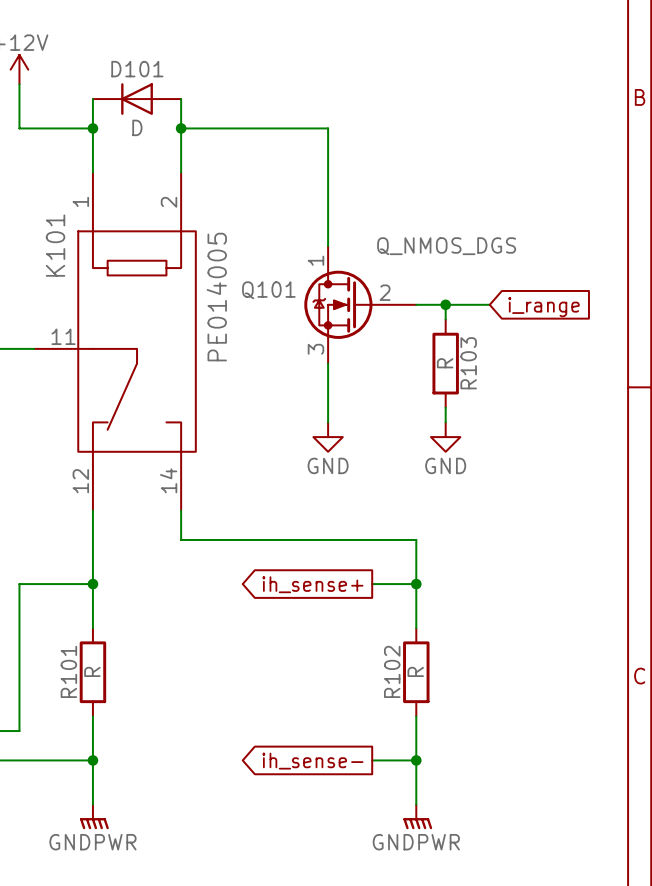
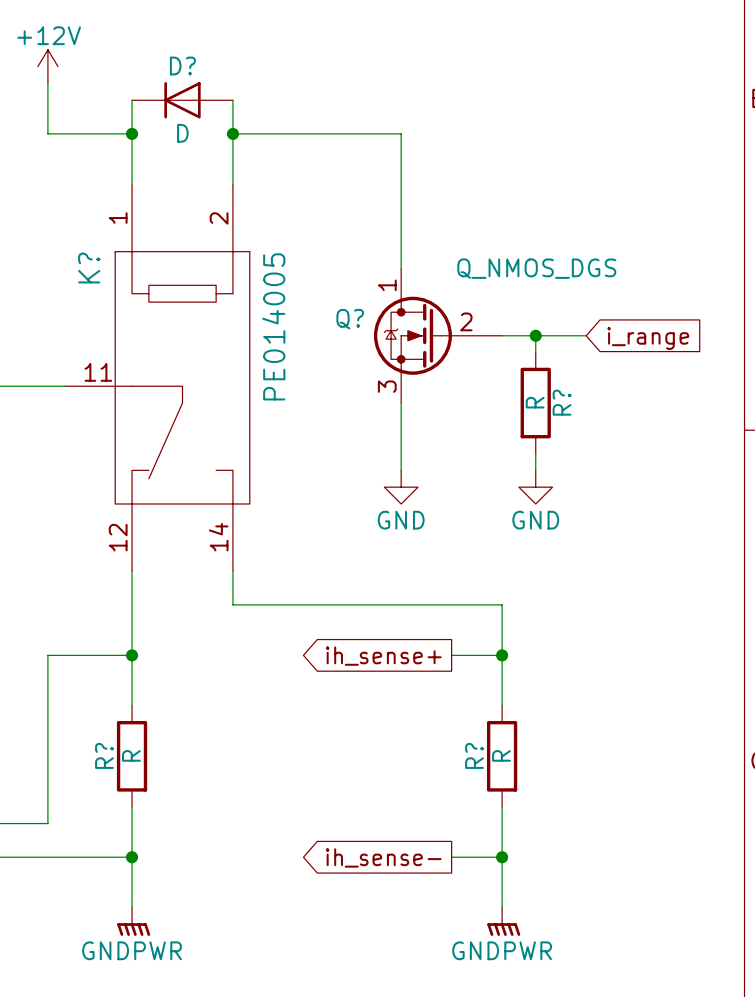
D101 name: D101 (137, 69) -> D? (182, 66)
K101 name: K101 (55, 245) -> K? (89, 268)
Q101 name: Q101 (268, 290) -> Q? (350, 319)
R103 name: R103 (468, 363) -> R? (562, 402)
R101 name: R101 (68, 671) -> R? (104, 755)
R102 name: R102 (392, 671) -> R? (474, 755)

